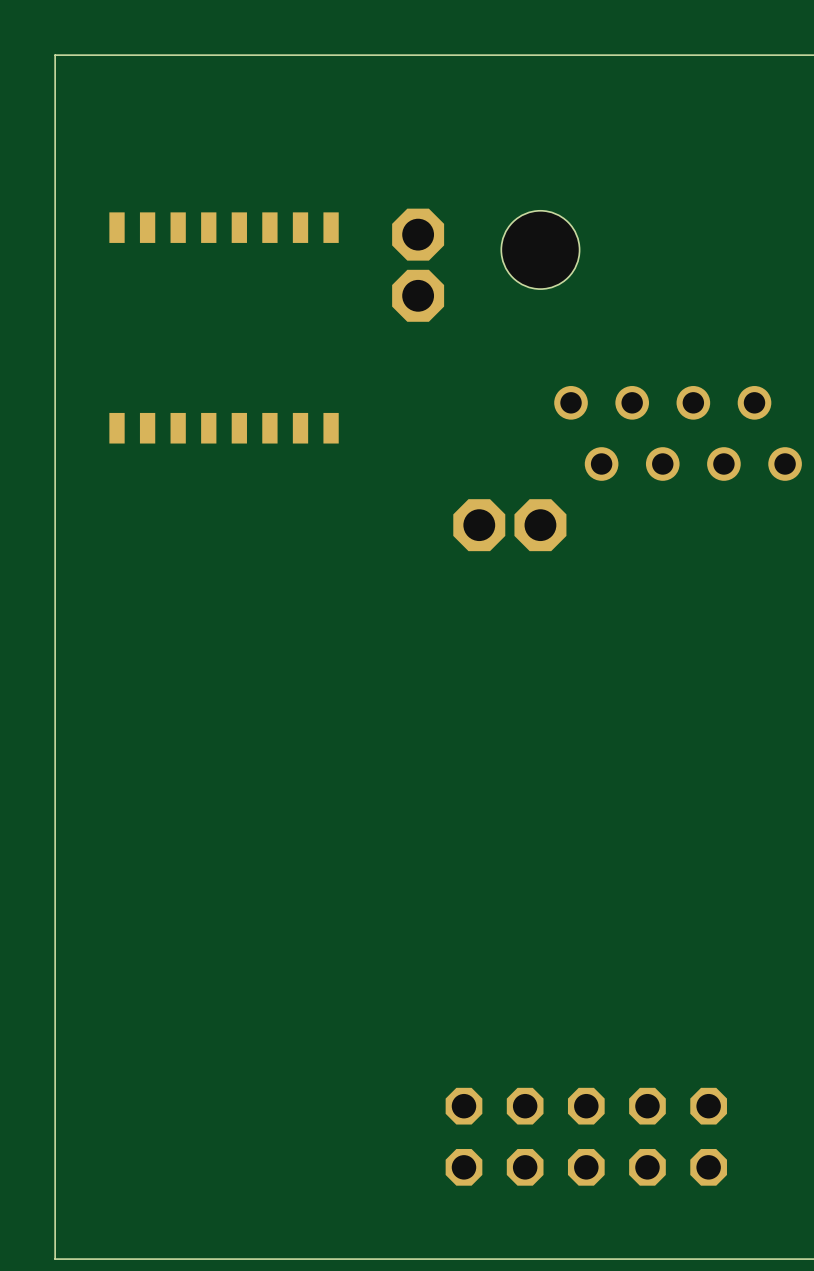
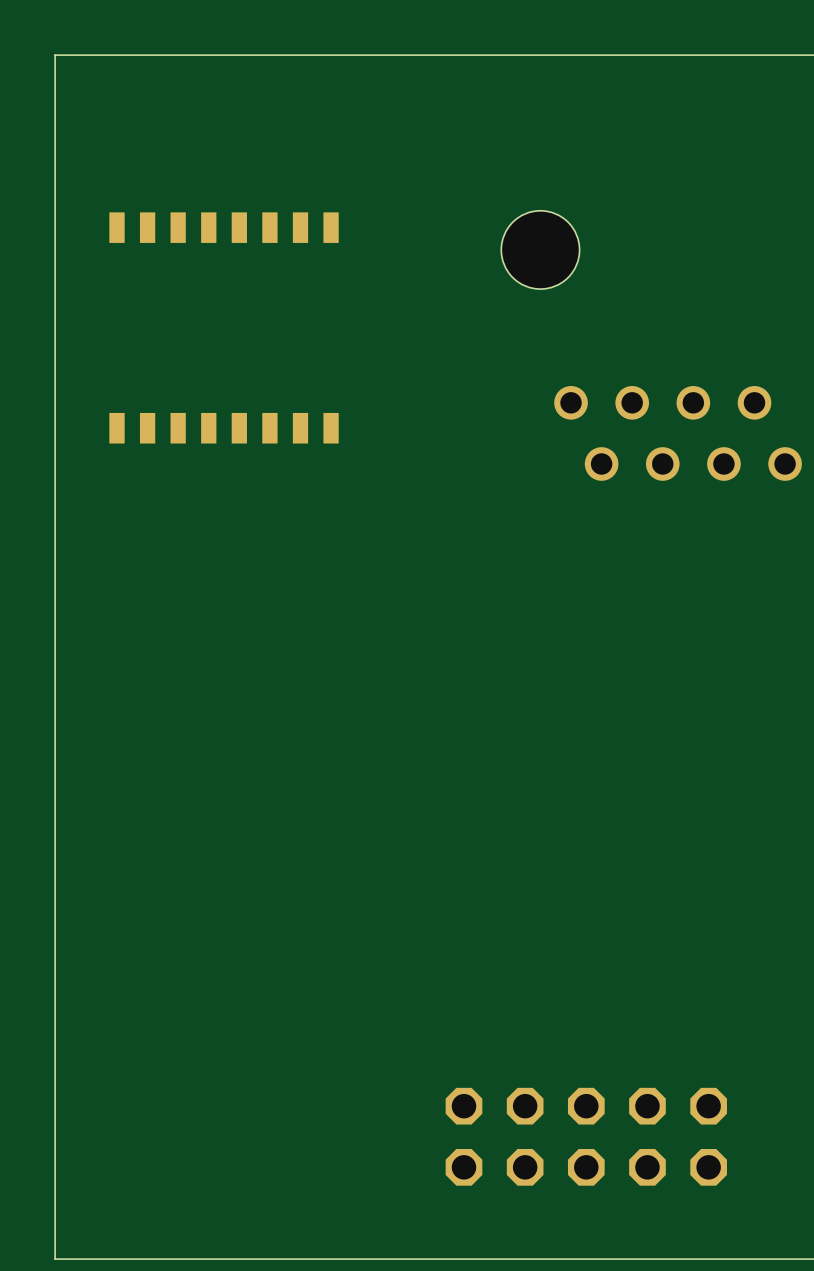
part: (418, 234) -> none
part: (418, 295) -> none
part: (479, 525) -> none
part: (540, 525) -> none

